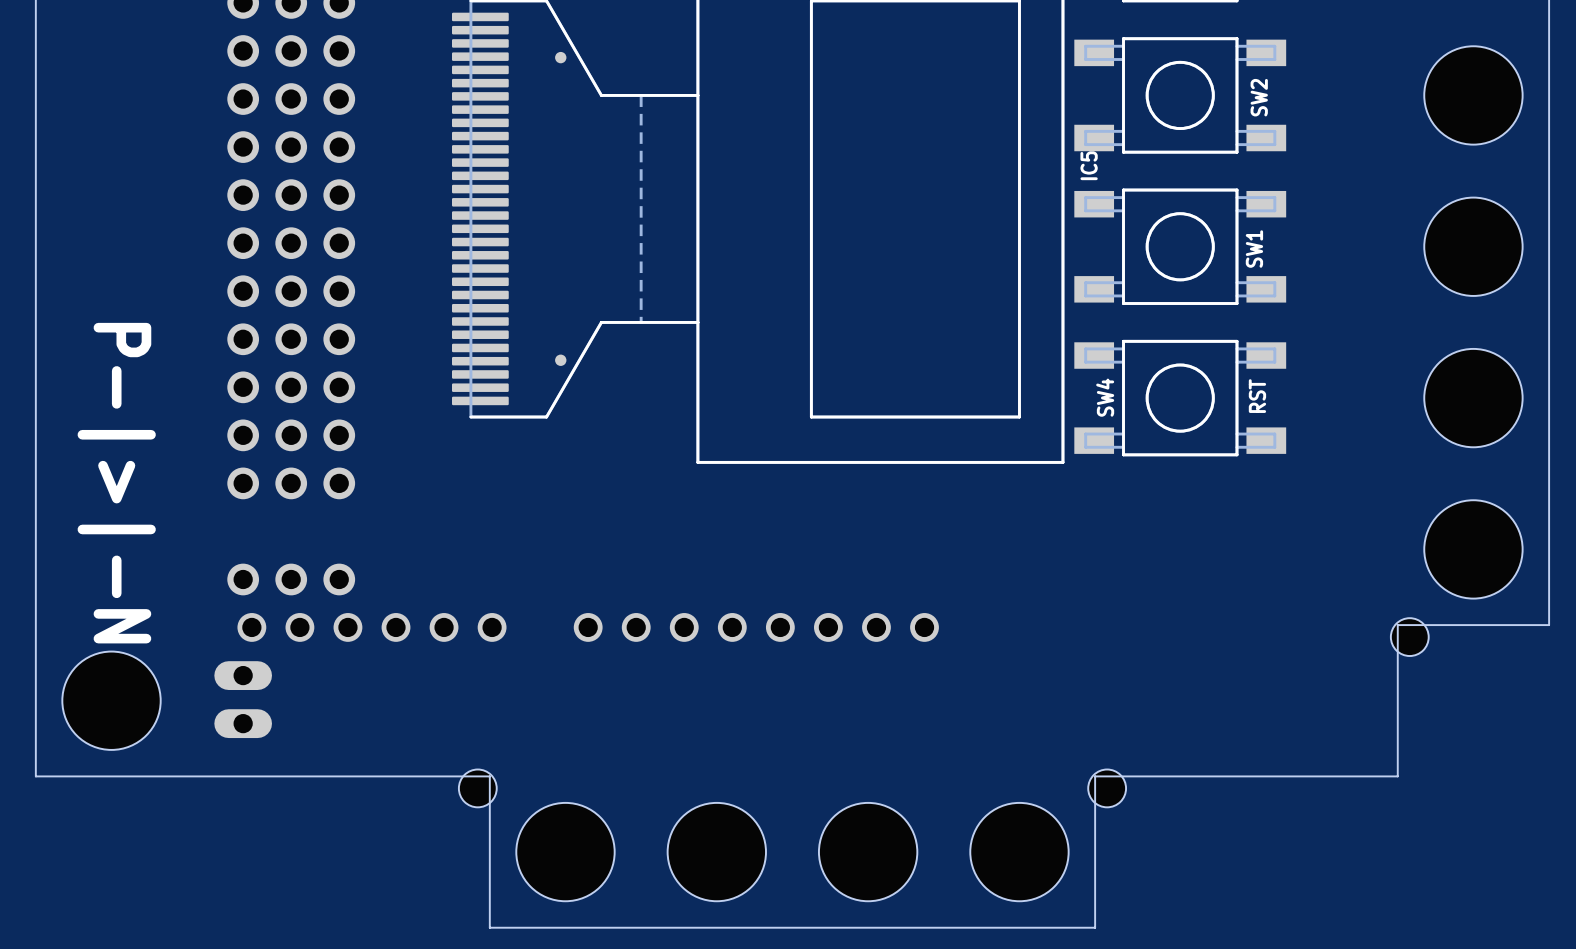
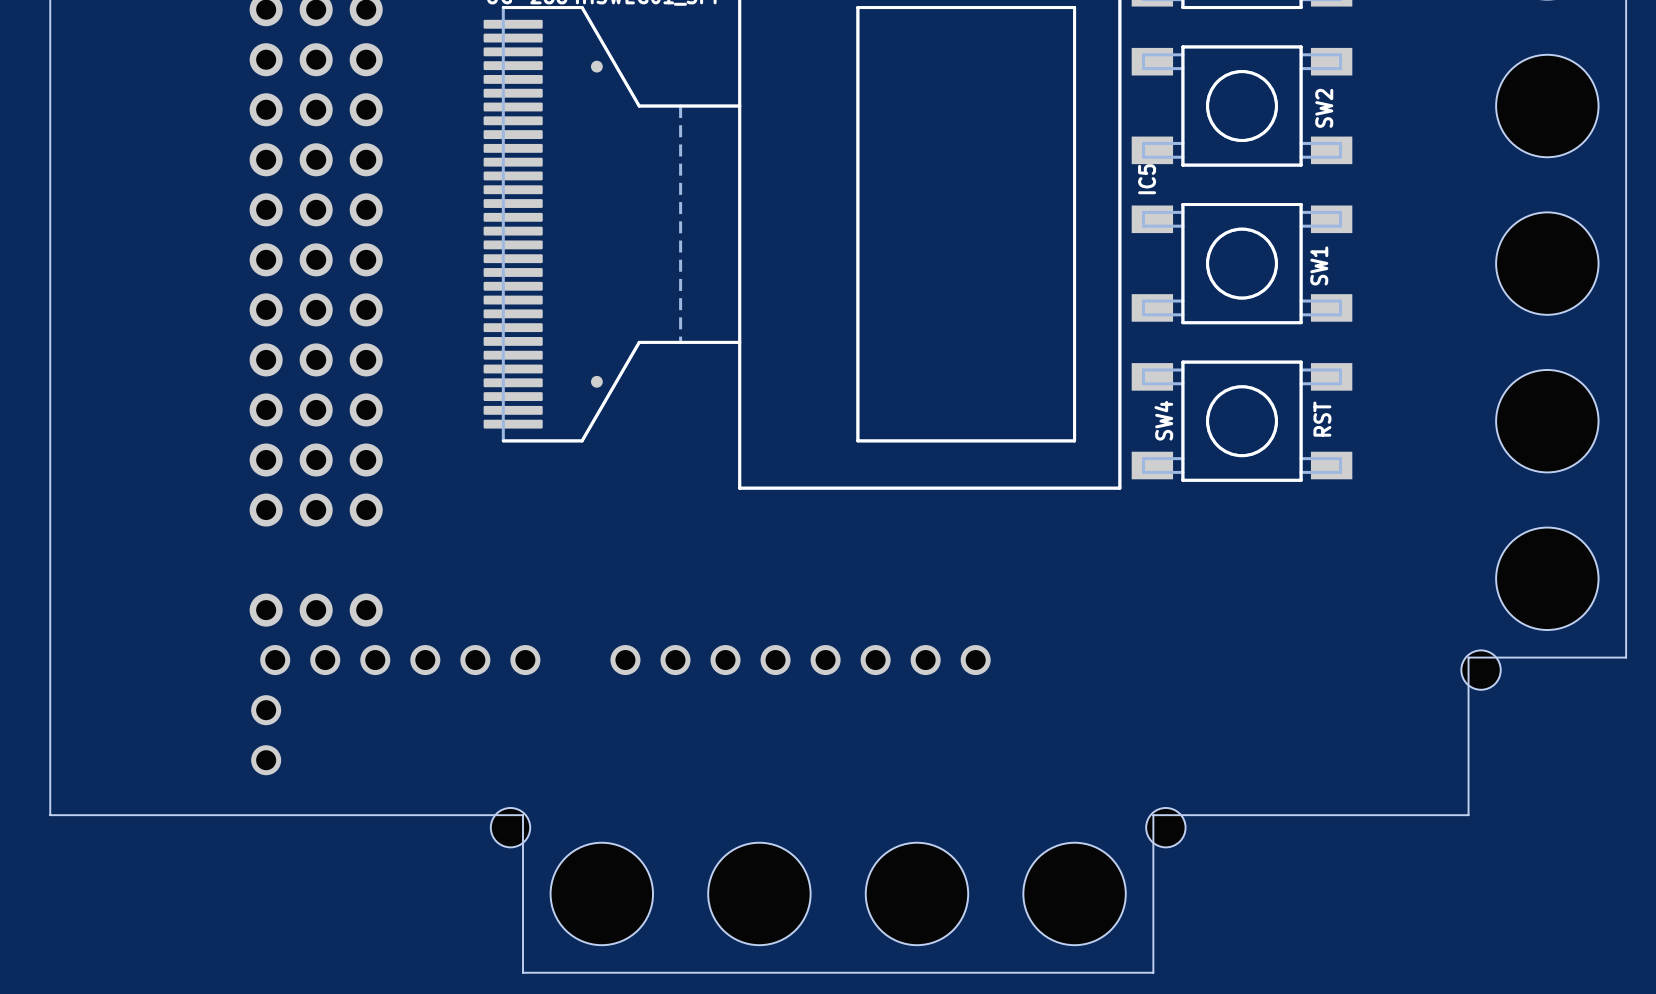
text: P-|>|-N (116, 483) -> none
part footprint: [214, 661, 272, 739] -> [251, 695, 282, 776]
hole: (111, 700) -> none

